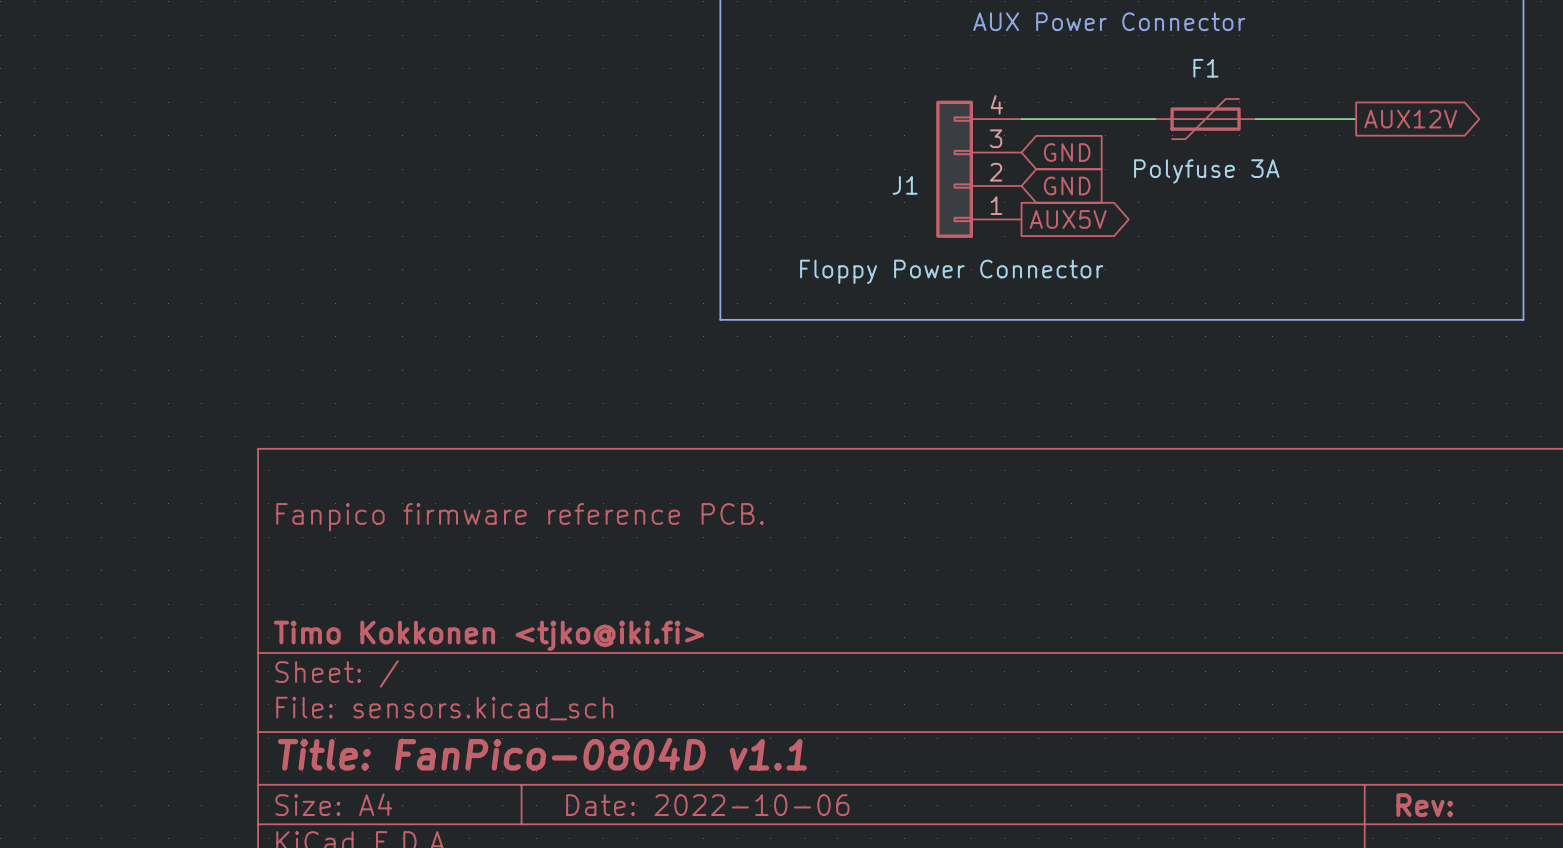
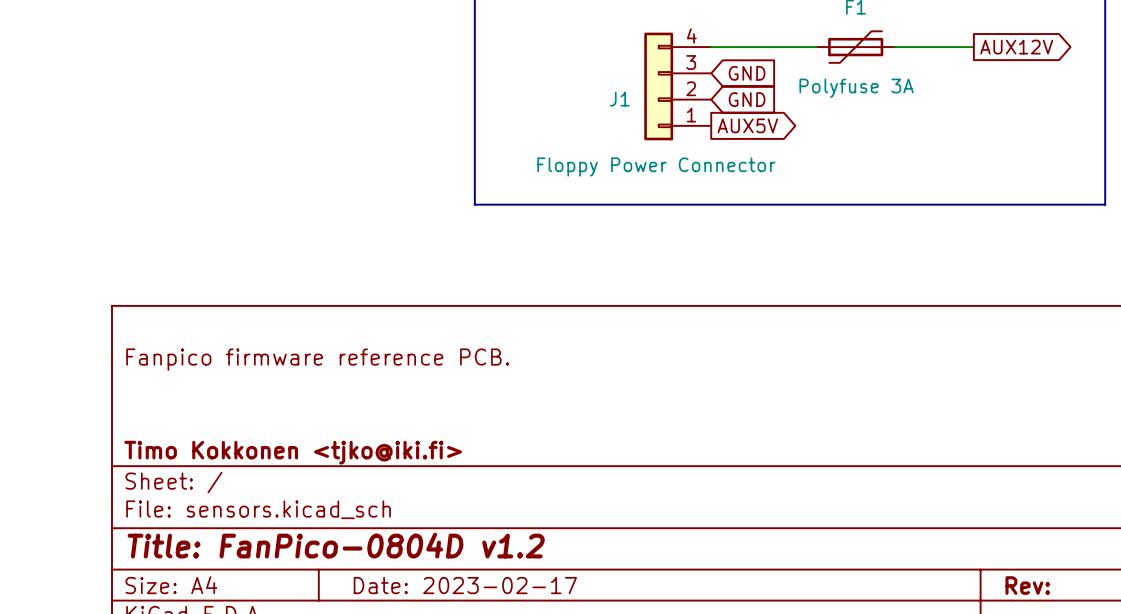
title block: Title: FanPico-0804D v1.1 (542, 754) -> Title: FanPico-0804D v1.2 (336, 545)
title block: Date: 2022-10-06 (707, 805) -> Date: 2023-02-17 (465, 585)

